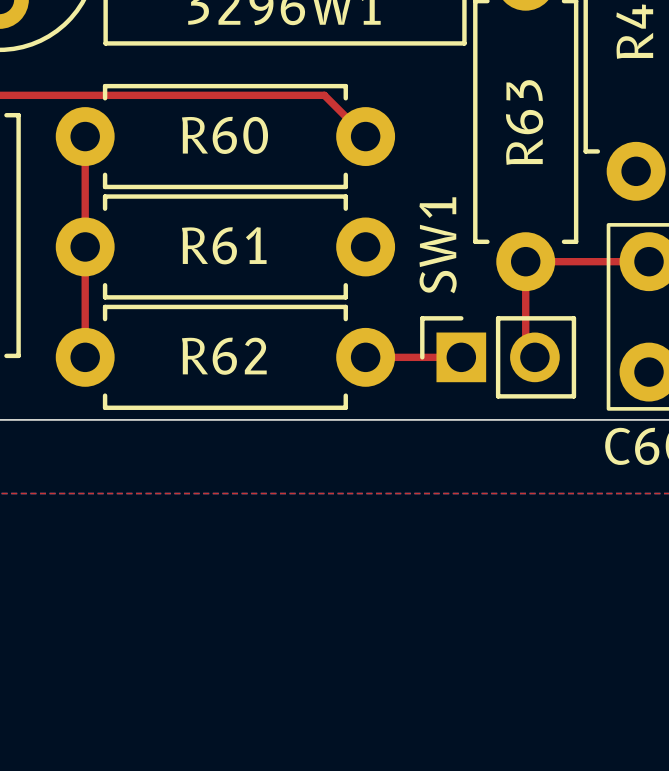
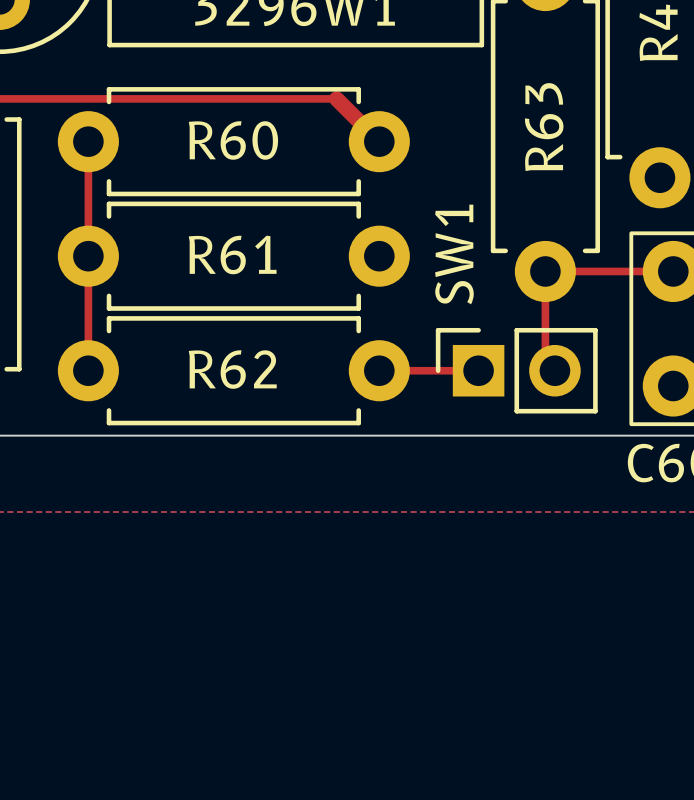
top track width: thin (324, 95) (365, 136) -> thick (336, 98) (379, 141)

